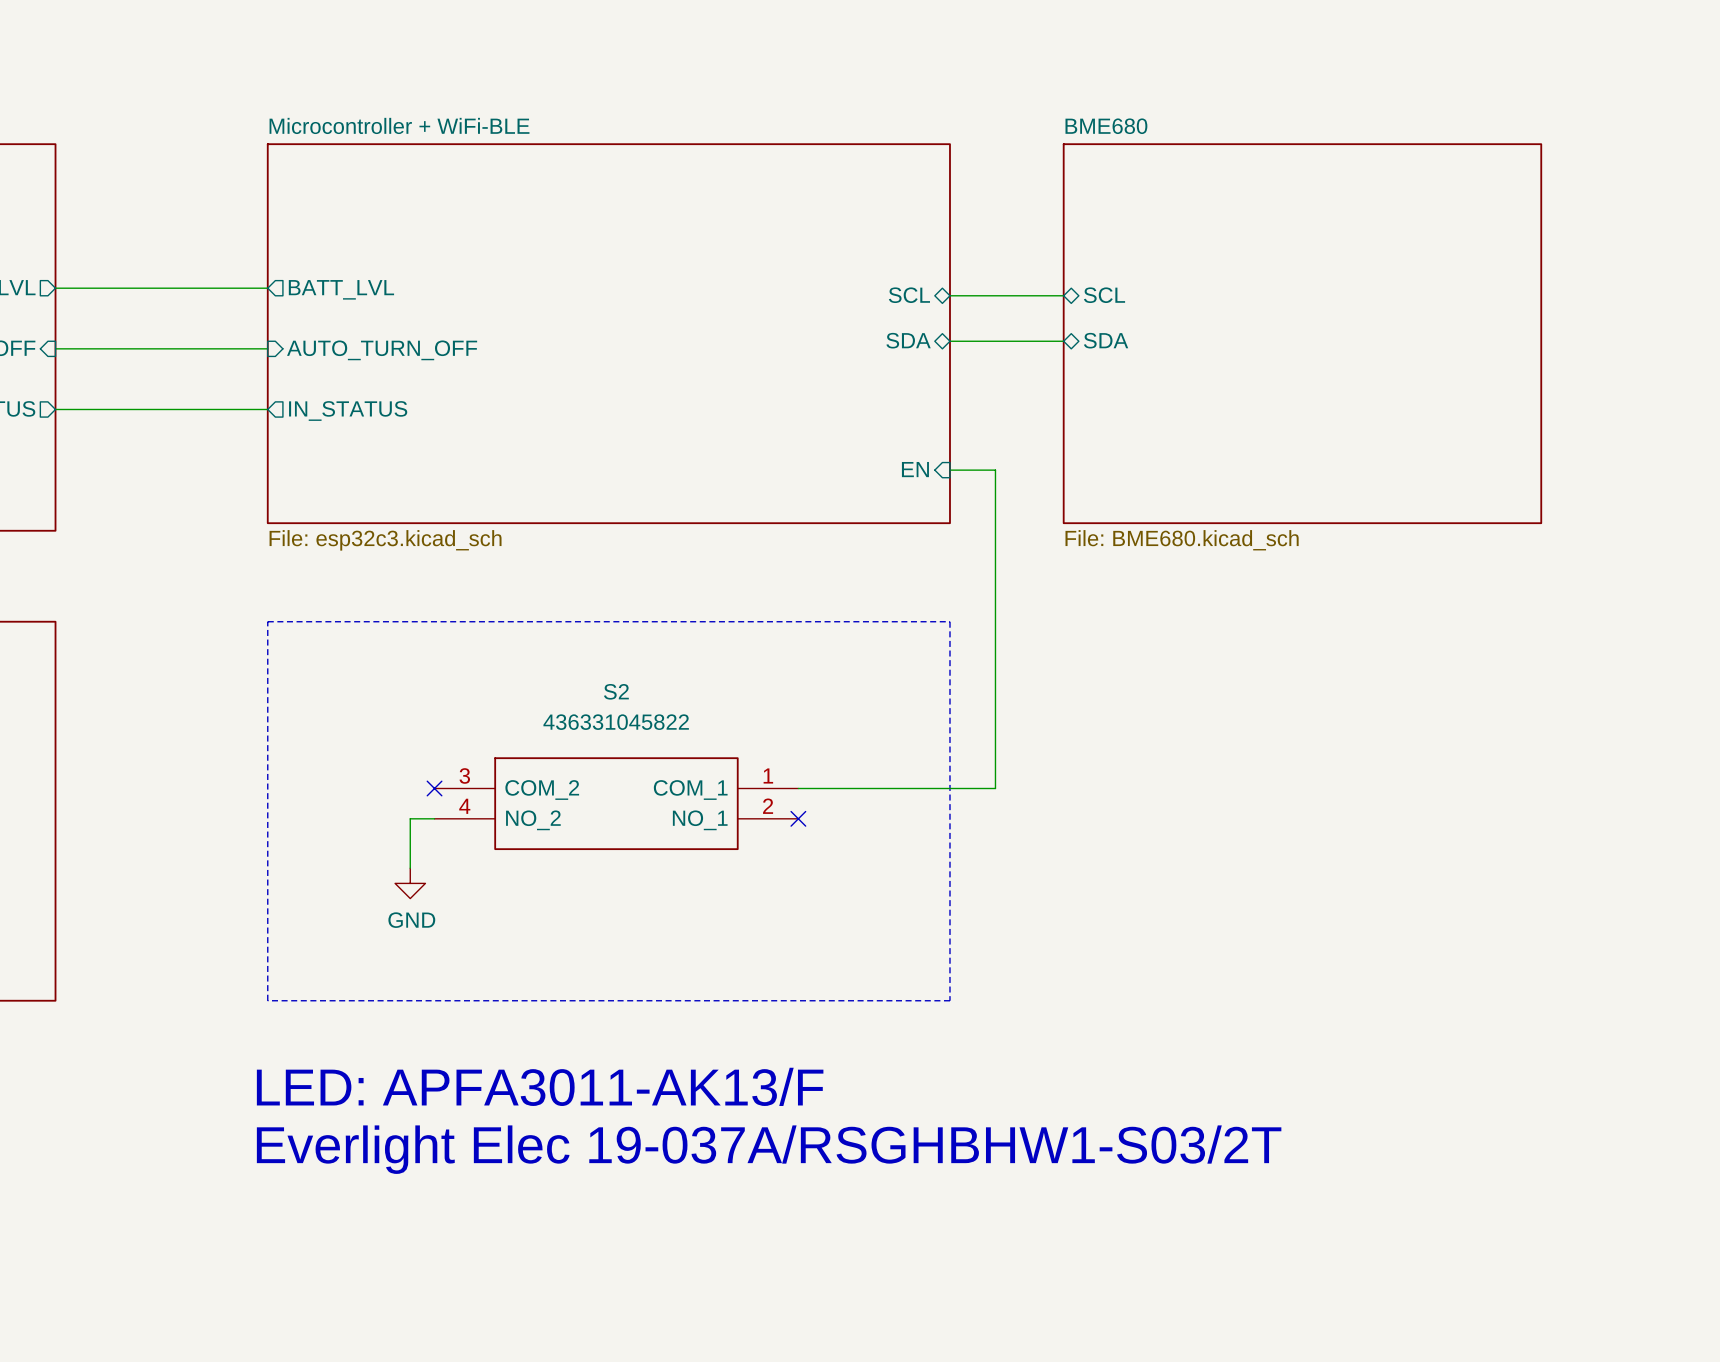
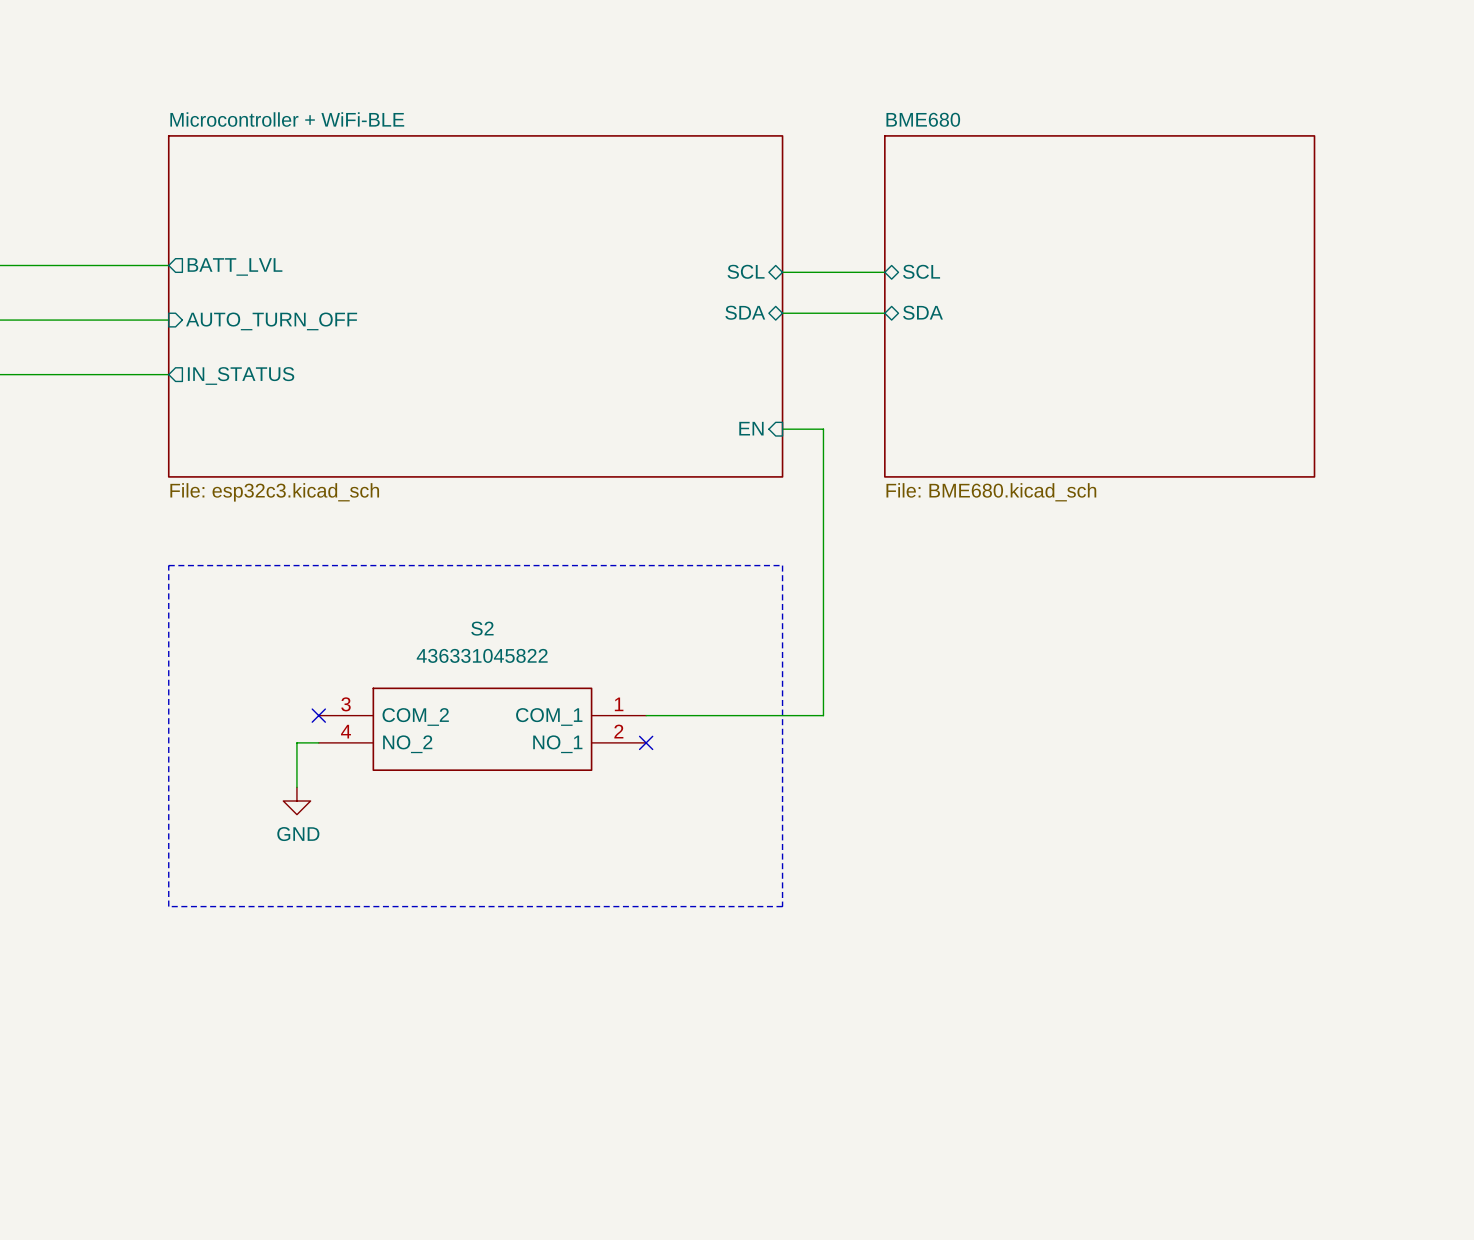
text: LED: APFA3011-AK13/F (540, 1086) -> none
text: Everlight Elec 19-037A/RSGHBHW1-S03/2T (769, 1149) -> none

